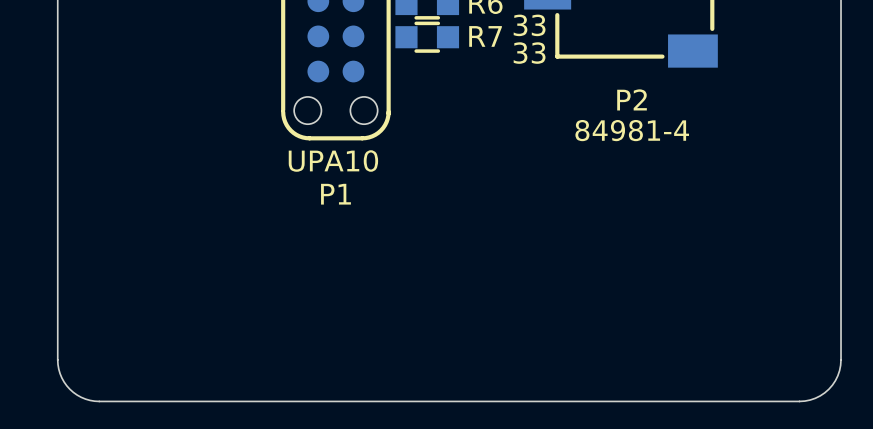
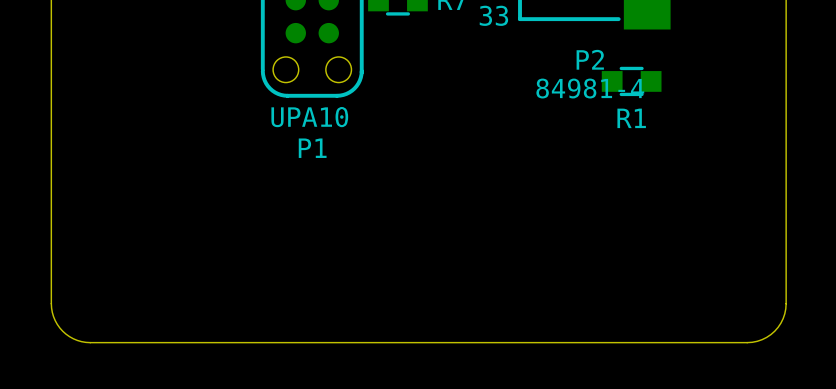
R1: none -> (631, 81)

